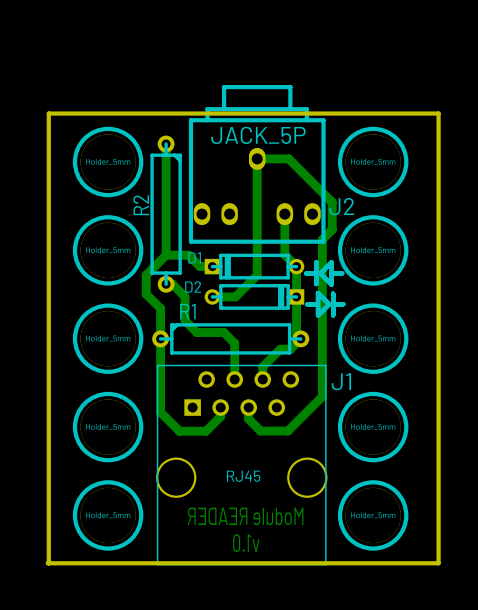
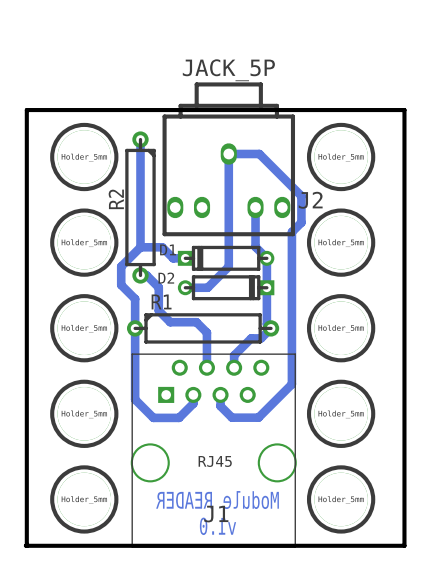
J2 value position: JACK_5P (258, 135) -> JACK_5P (228, 70)
line: (316, 262) (316, 284) -> none
line: (331, 262) (331, 284) (320, 273) (331, 262) -> none
line: (306, 273) (316, 273) -> none
line: (331, 273) (342, 273) -> none
line: (318, 293) (318, 315) (329, 304) (318, 293) -> none
line: (333, 293) (333, 315) -> none
line: (307, 304) (318, 304) -> none
line: (333, 304) (343, 304) -> none
J1 name position: J1 (341, 381) -> J1 (216, 514)

